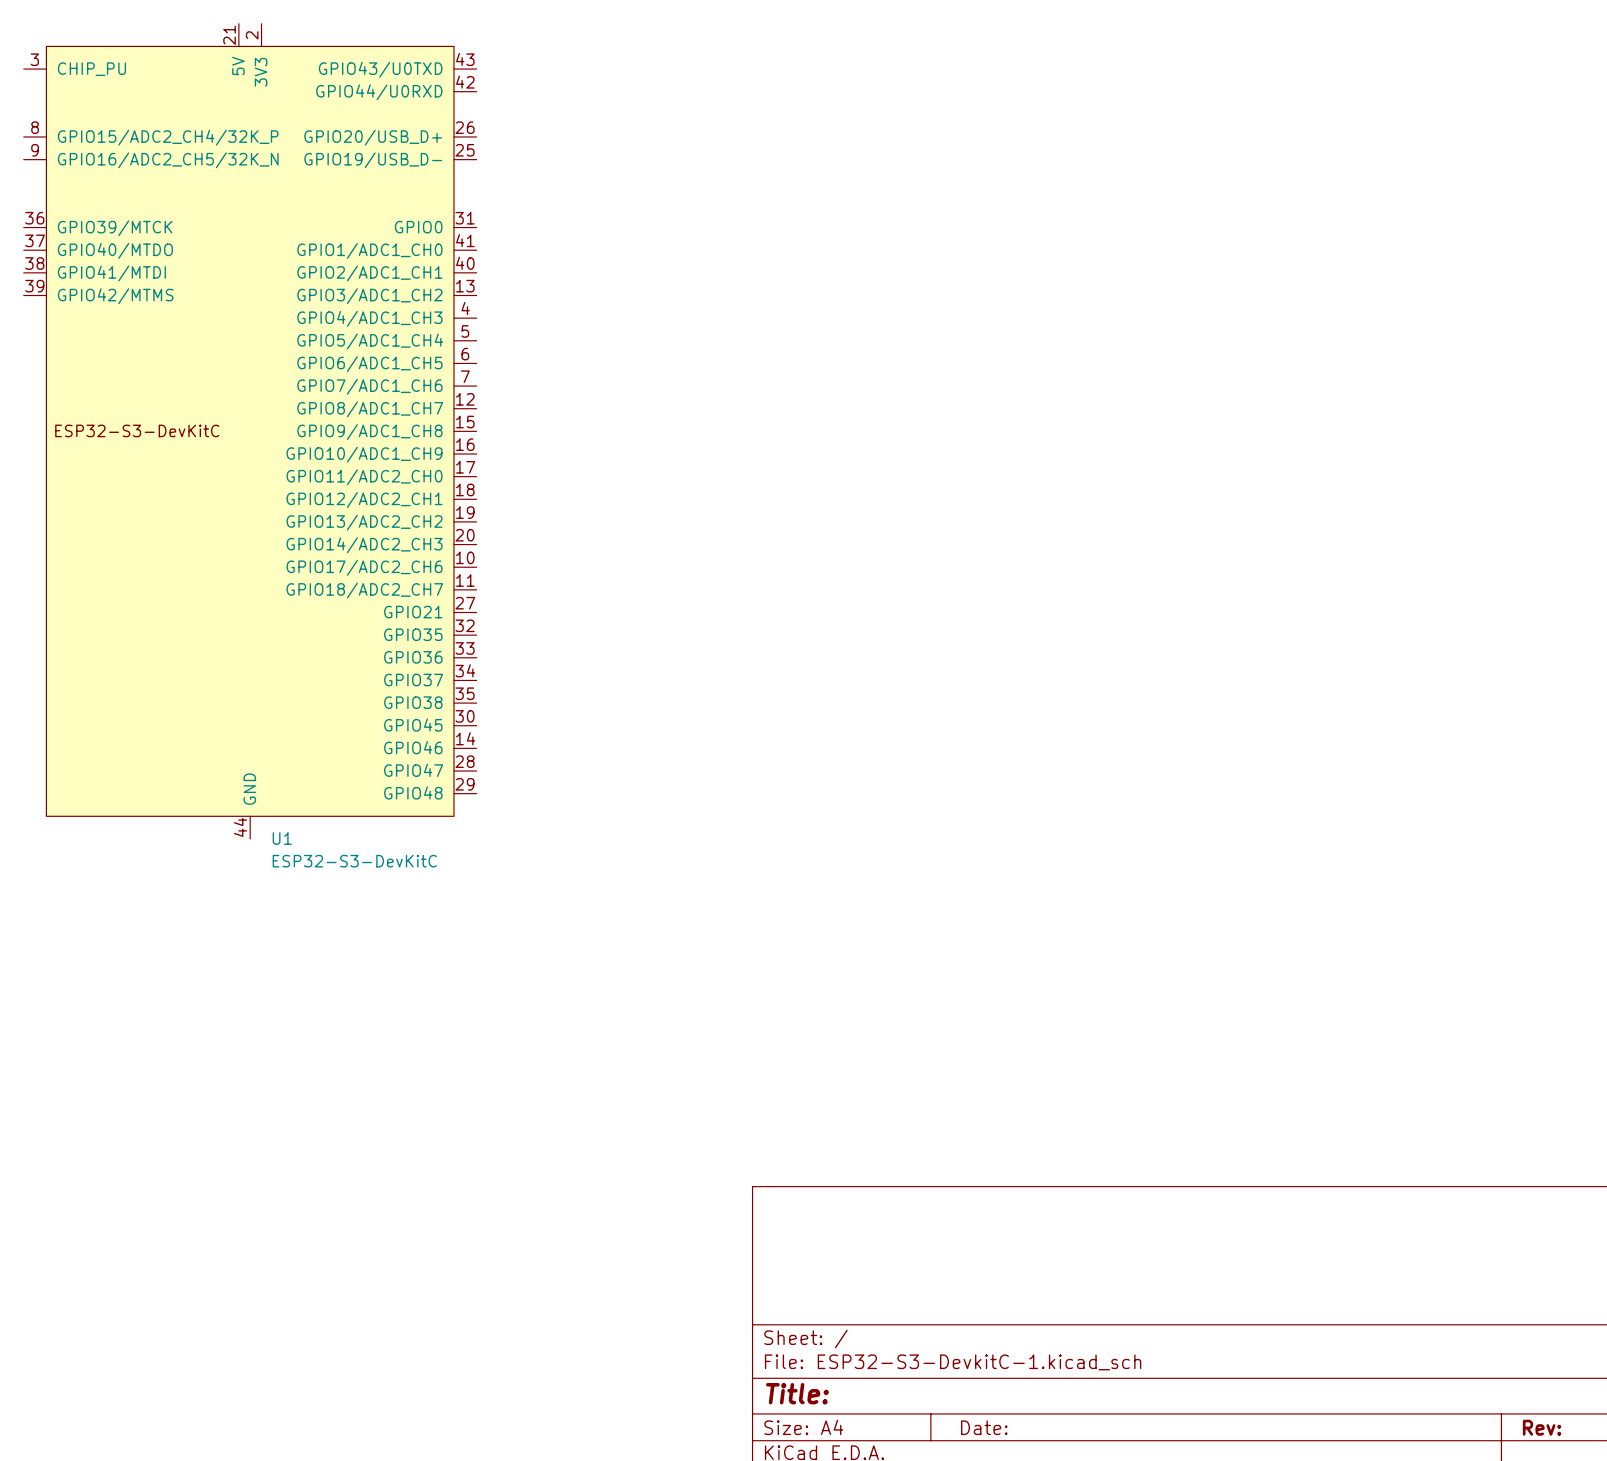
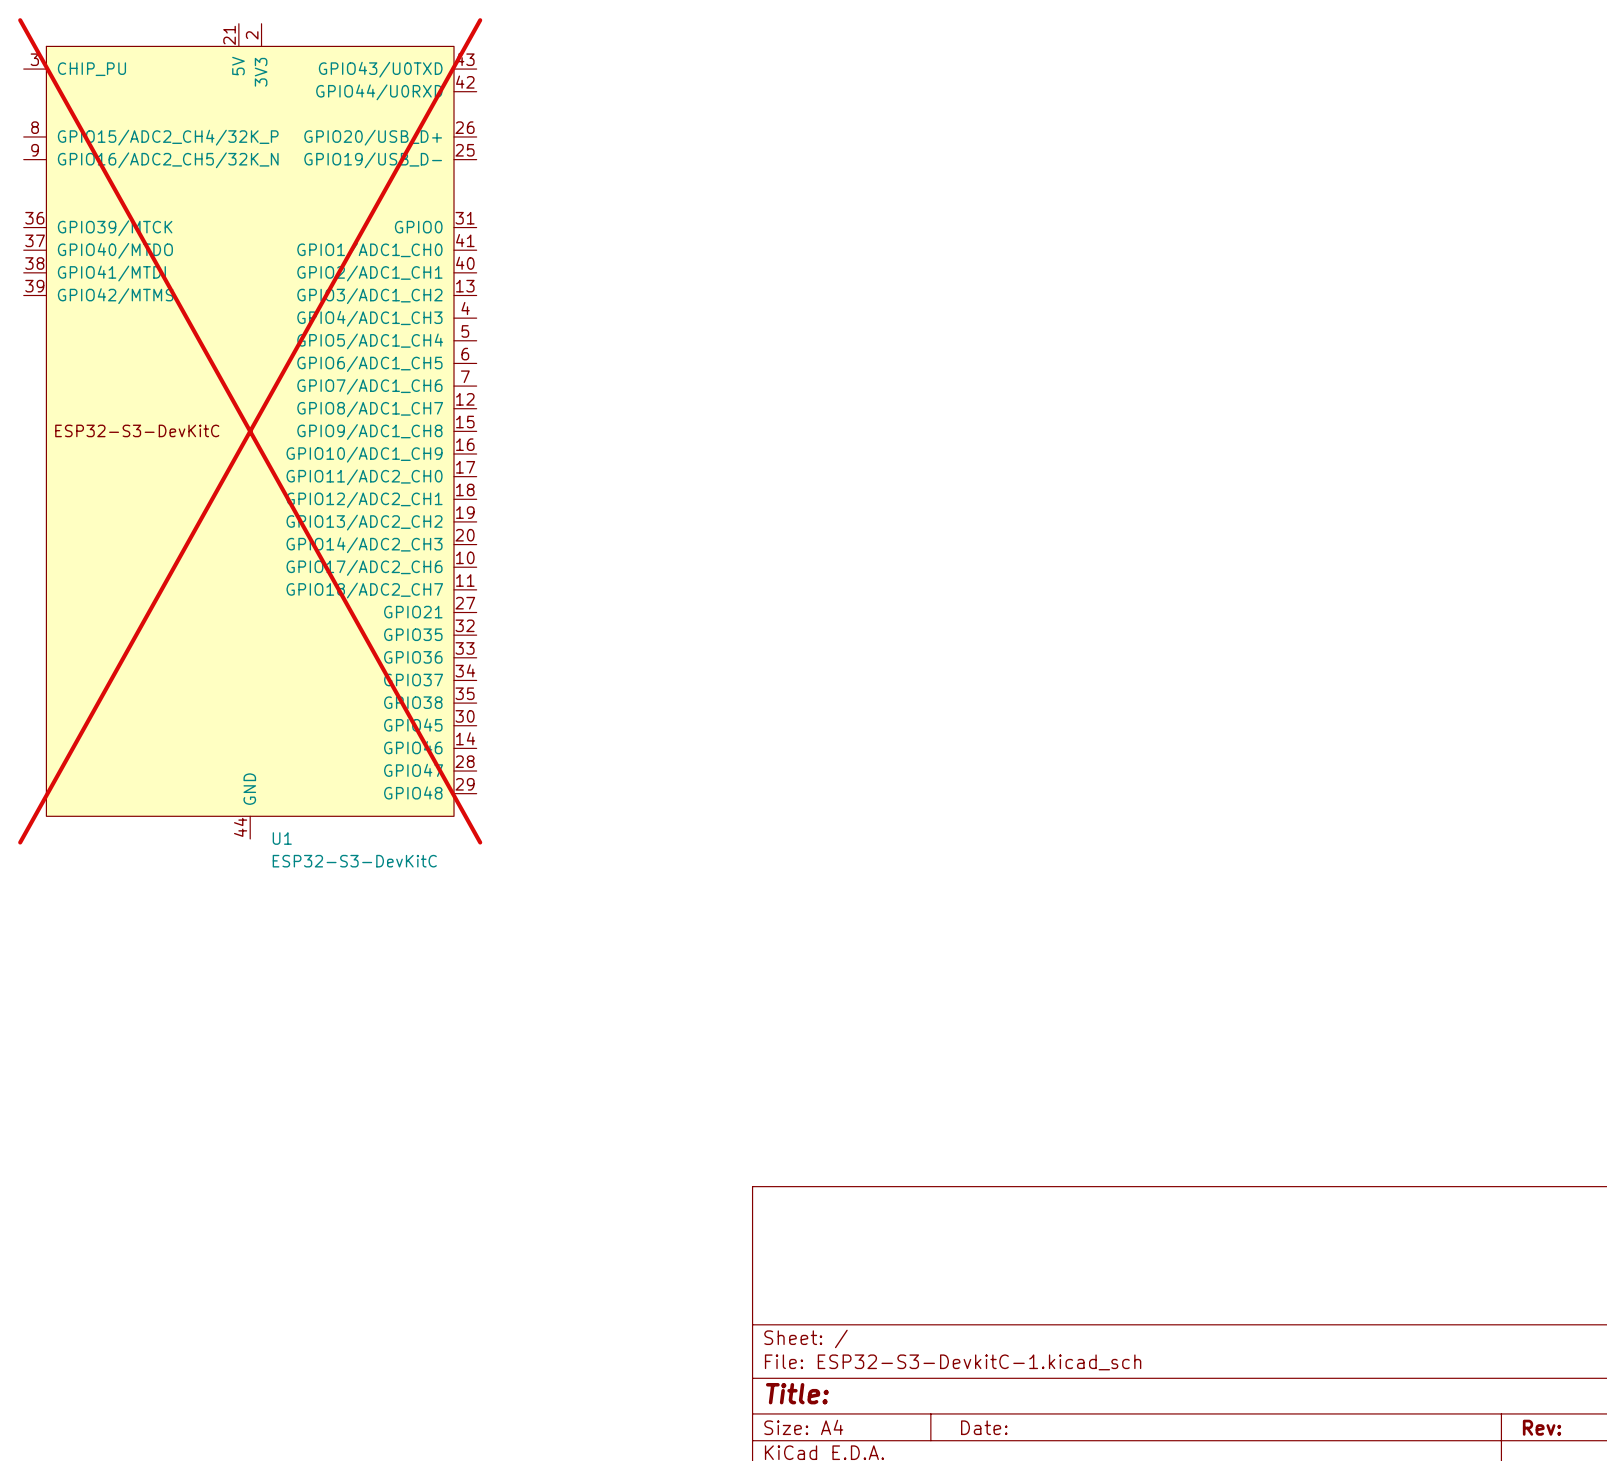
U1 do-not-place cross: none -> (250, 431)

